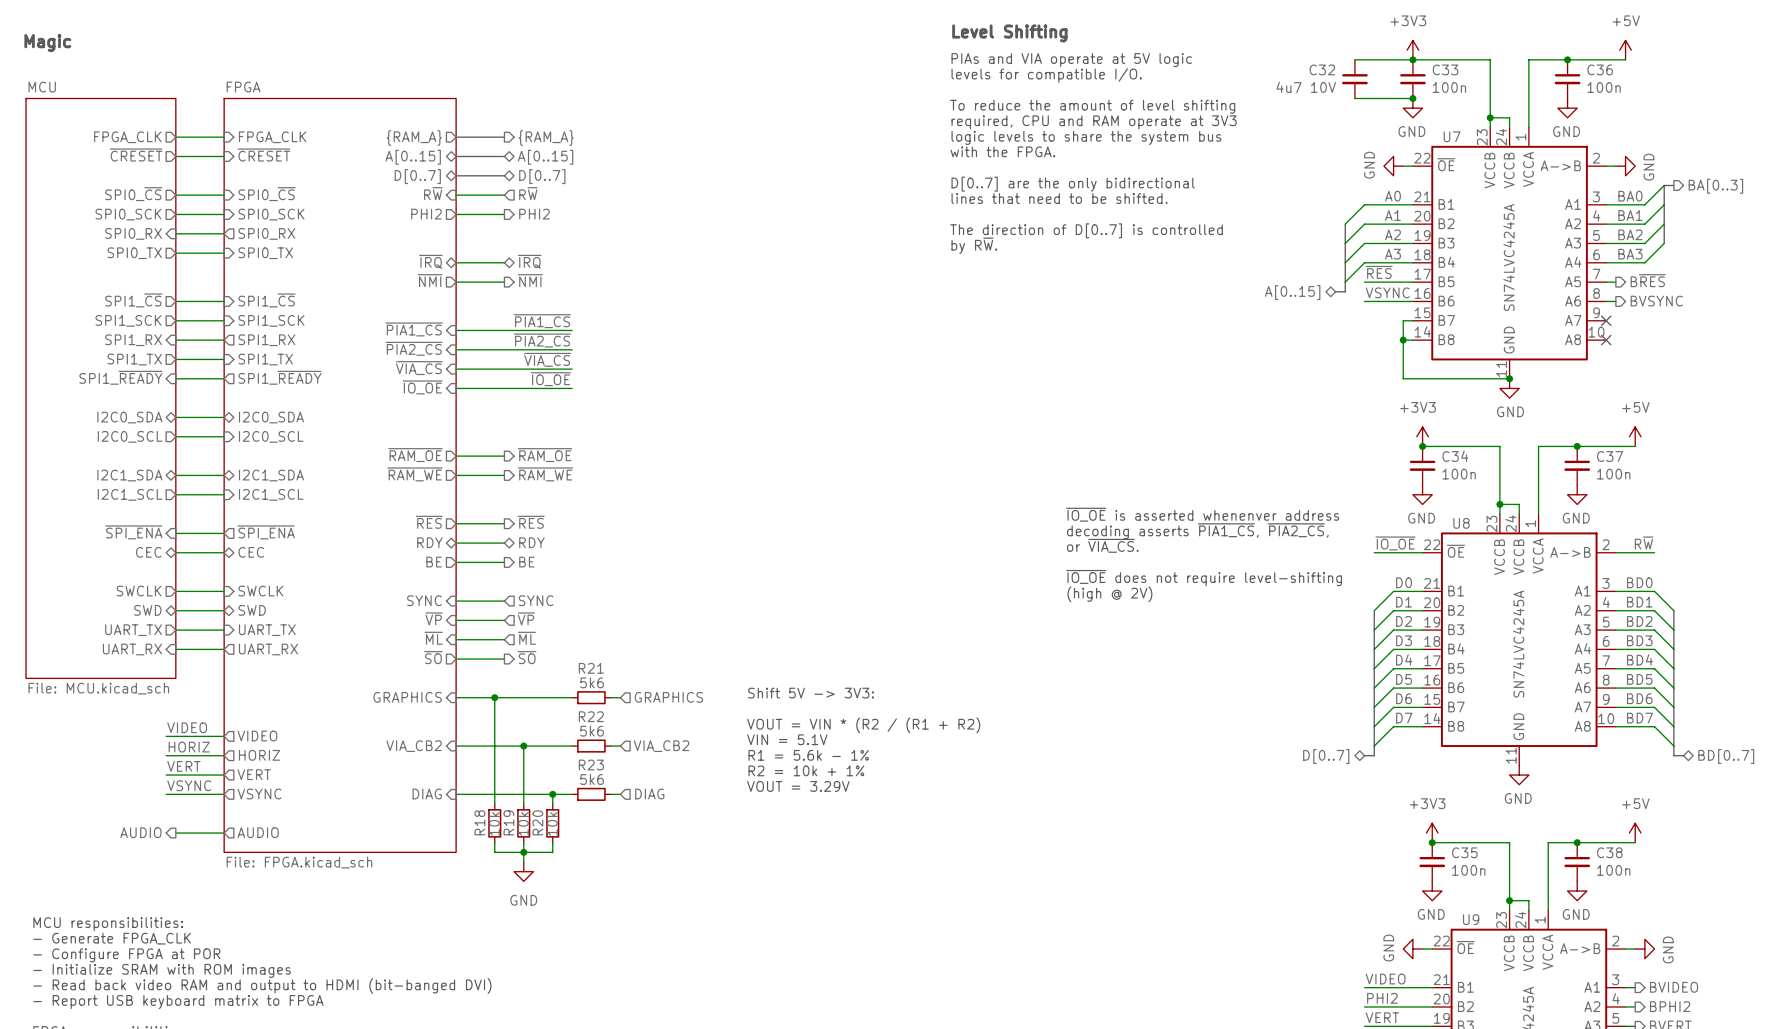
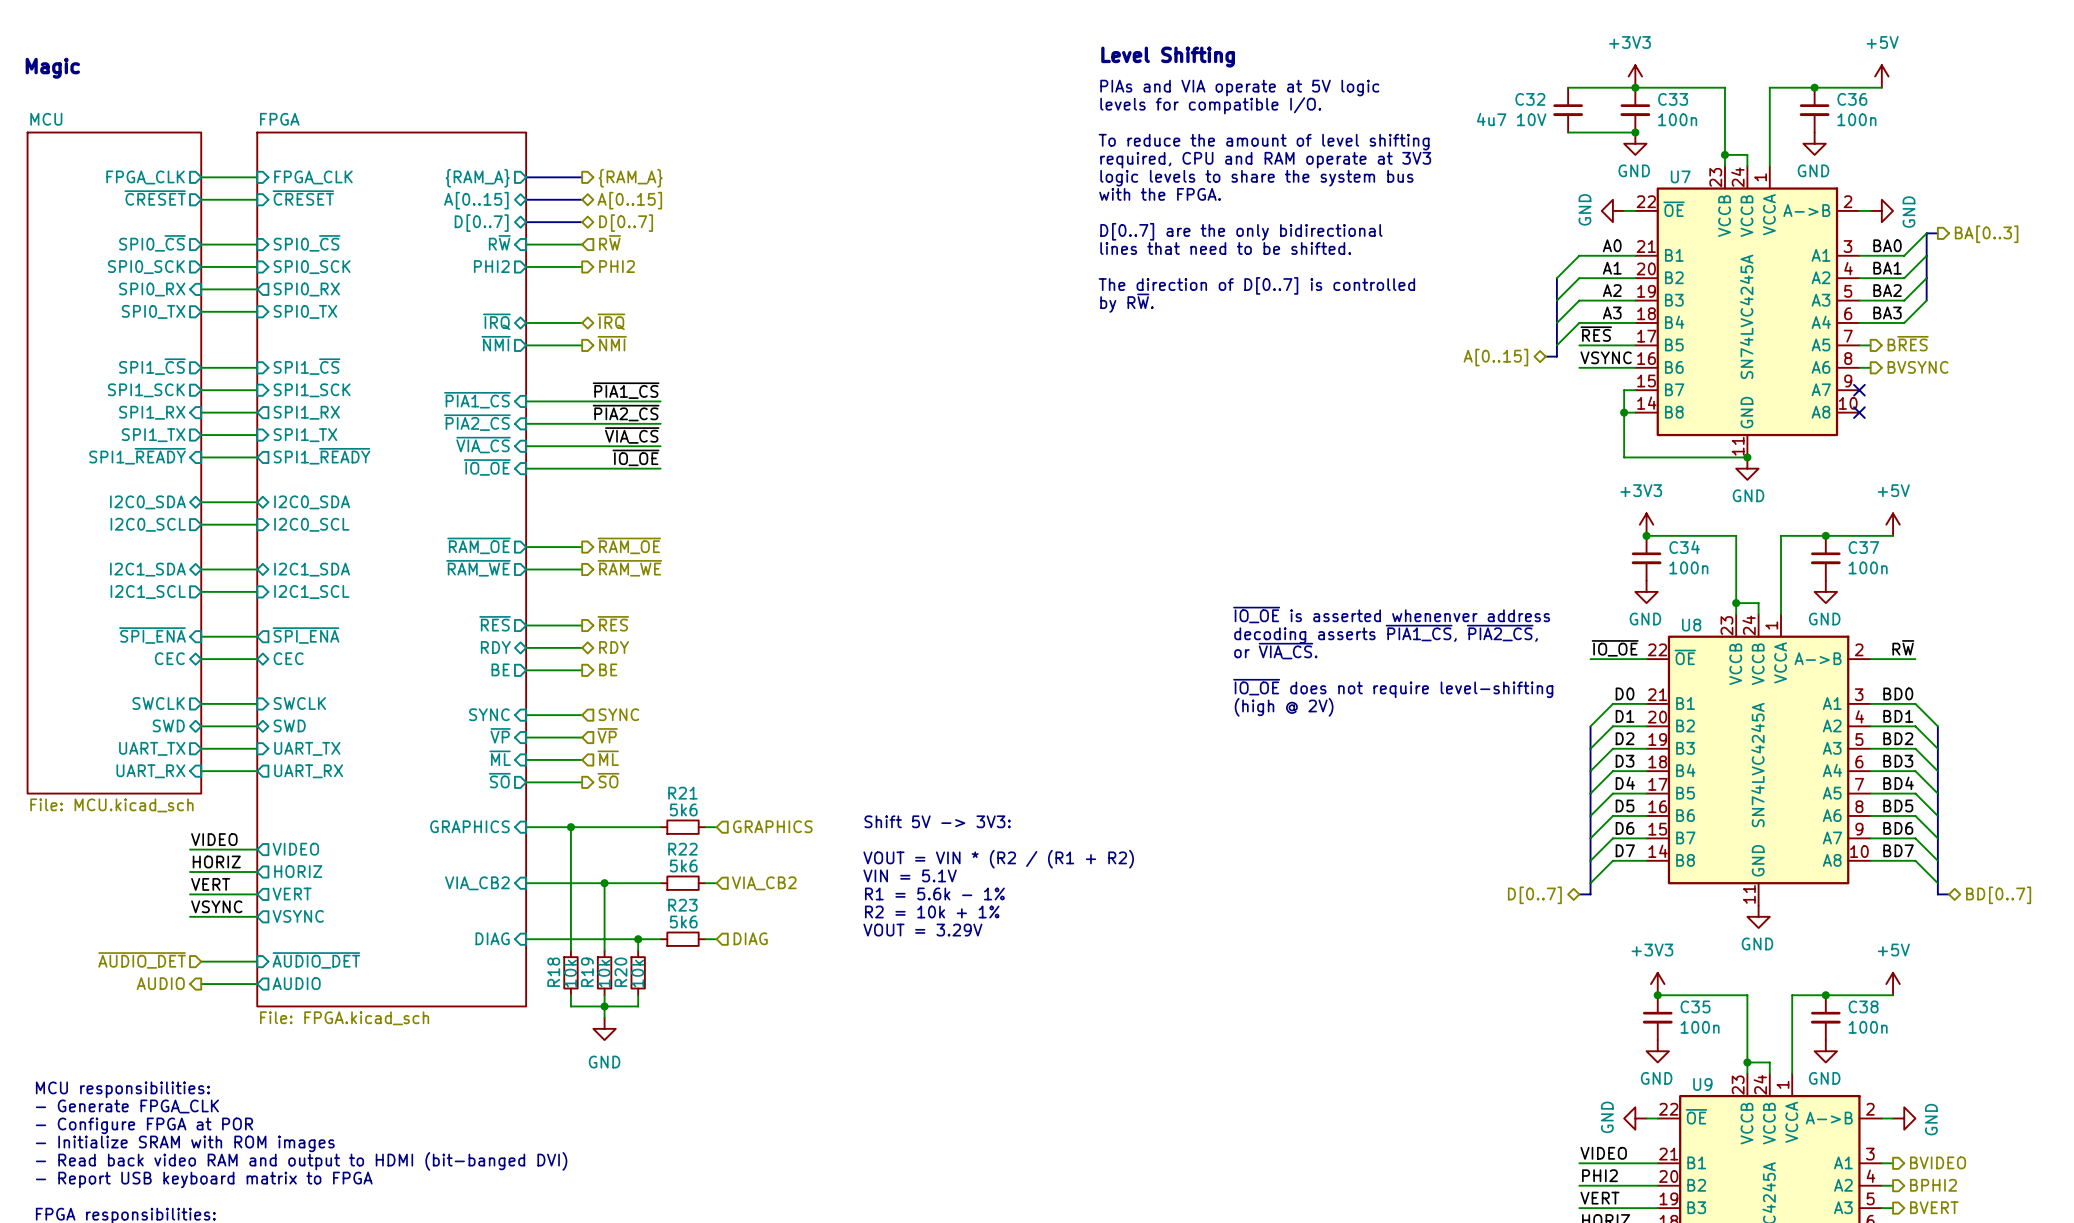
sheet MCU shape: [25, 97, 177, 679] -> [26, 131, 202, 795]
label: none -> VIDEO (214, 839)
sheet pin: none -> VIDEO (295, 849)
label: VIDEO (187, 727) -> HORIZ (216, 862)
sheet pin: VIDEO (257, 736) -> HORIZ (298, 871)
label: HORIZ (189, 747) -> VERT (210, 884)
sheet pin: HORIZ (259, 755) -> VERT (292, 893)
label: VERT (183, 766) -> VSYNC (216, 906)
sheet pin: VERT (254, 774) -> VSYNC (298, 916)
label: VSYNC (189, 785) -> none
wire: (166, 794) (224, 794) -> (190, 849) (257, 849)
sheet pin: VSYNC (259, 794) -> none
hierarchical label: none -> ~{AUDIO_DET} (142, 960)
sheet pin: none -> ~{AUDIO_DET} (316, 960)
wire: none -> (201, 961) (257, 961)

